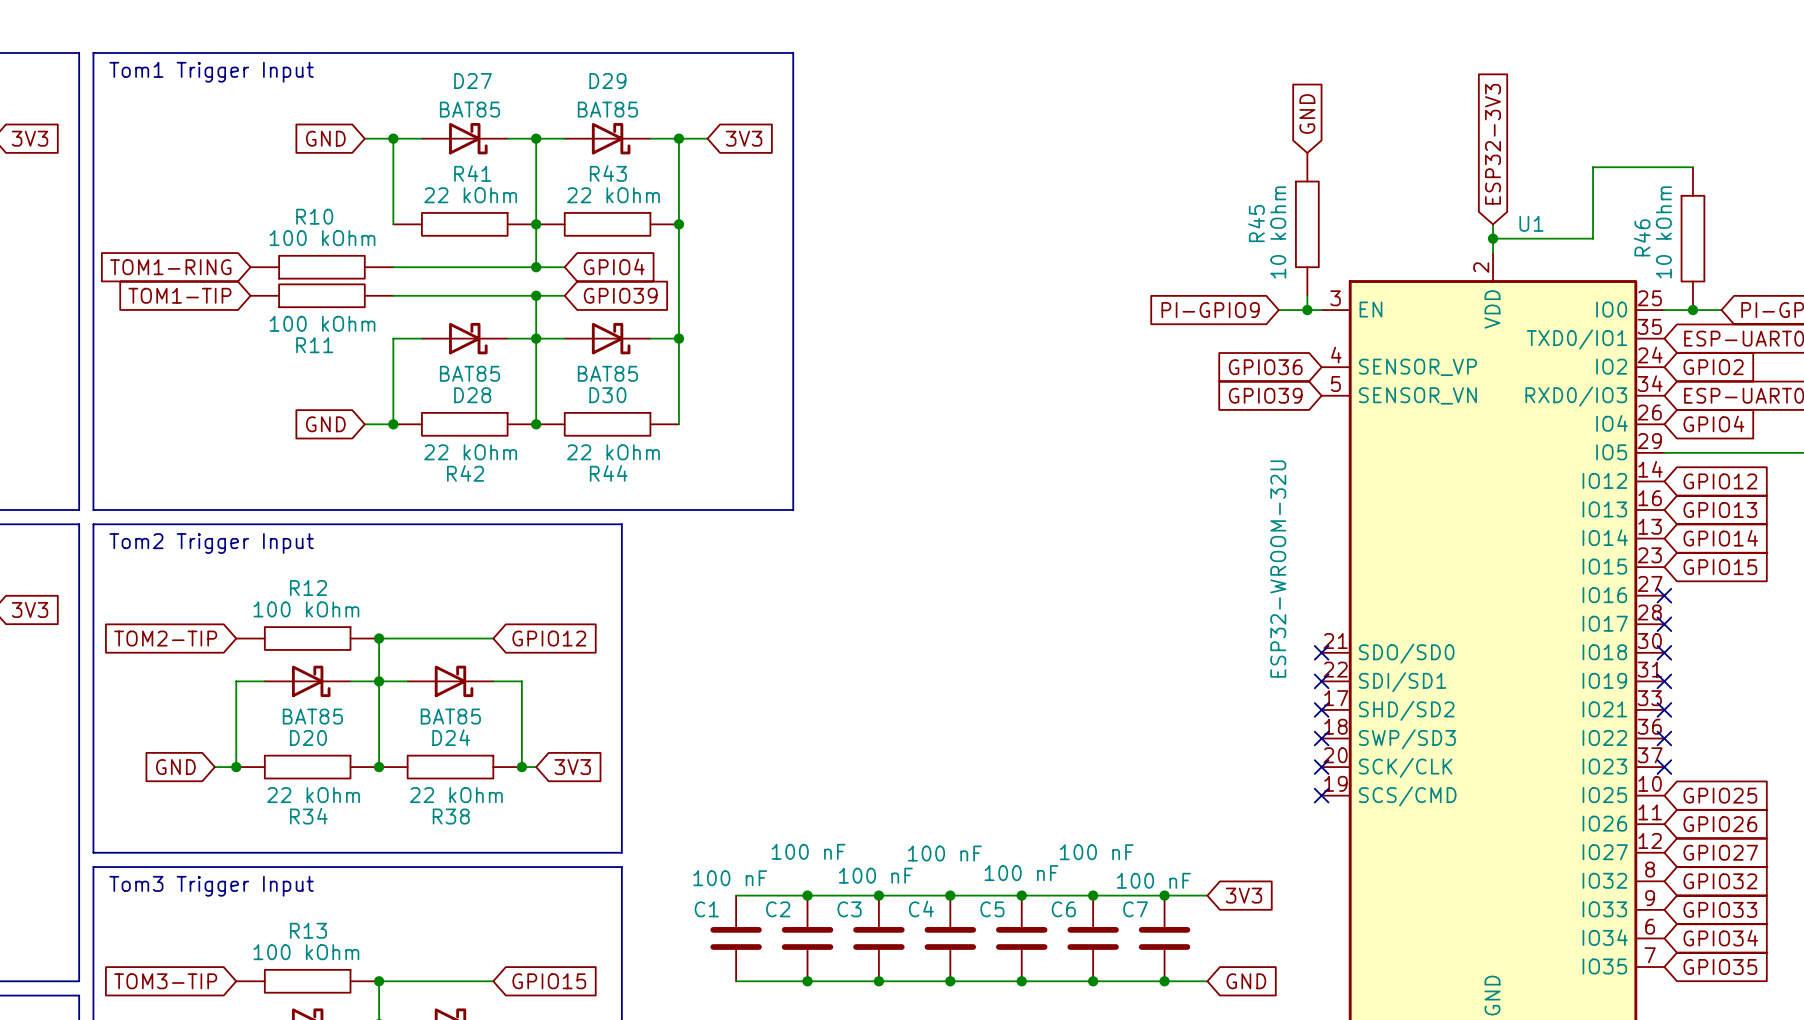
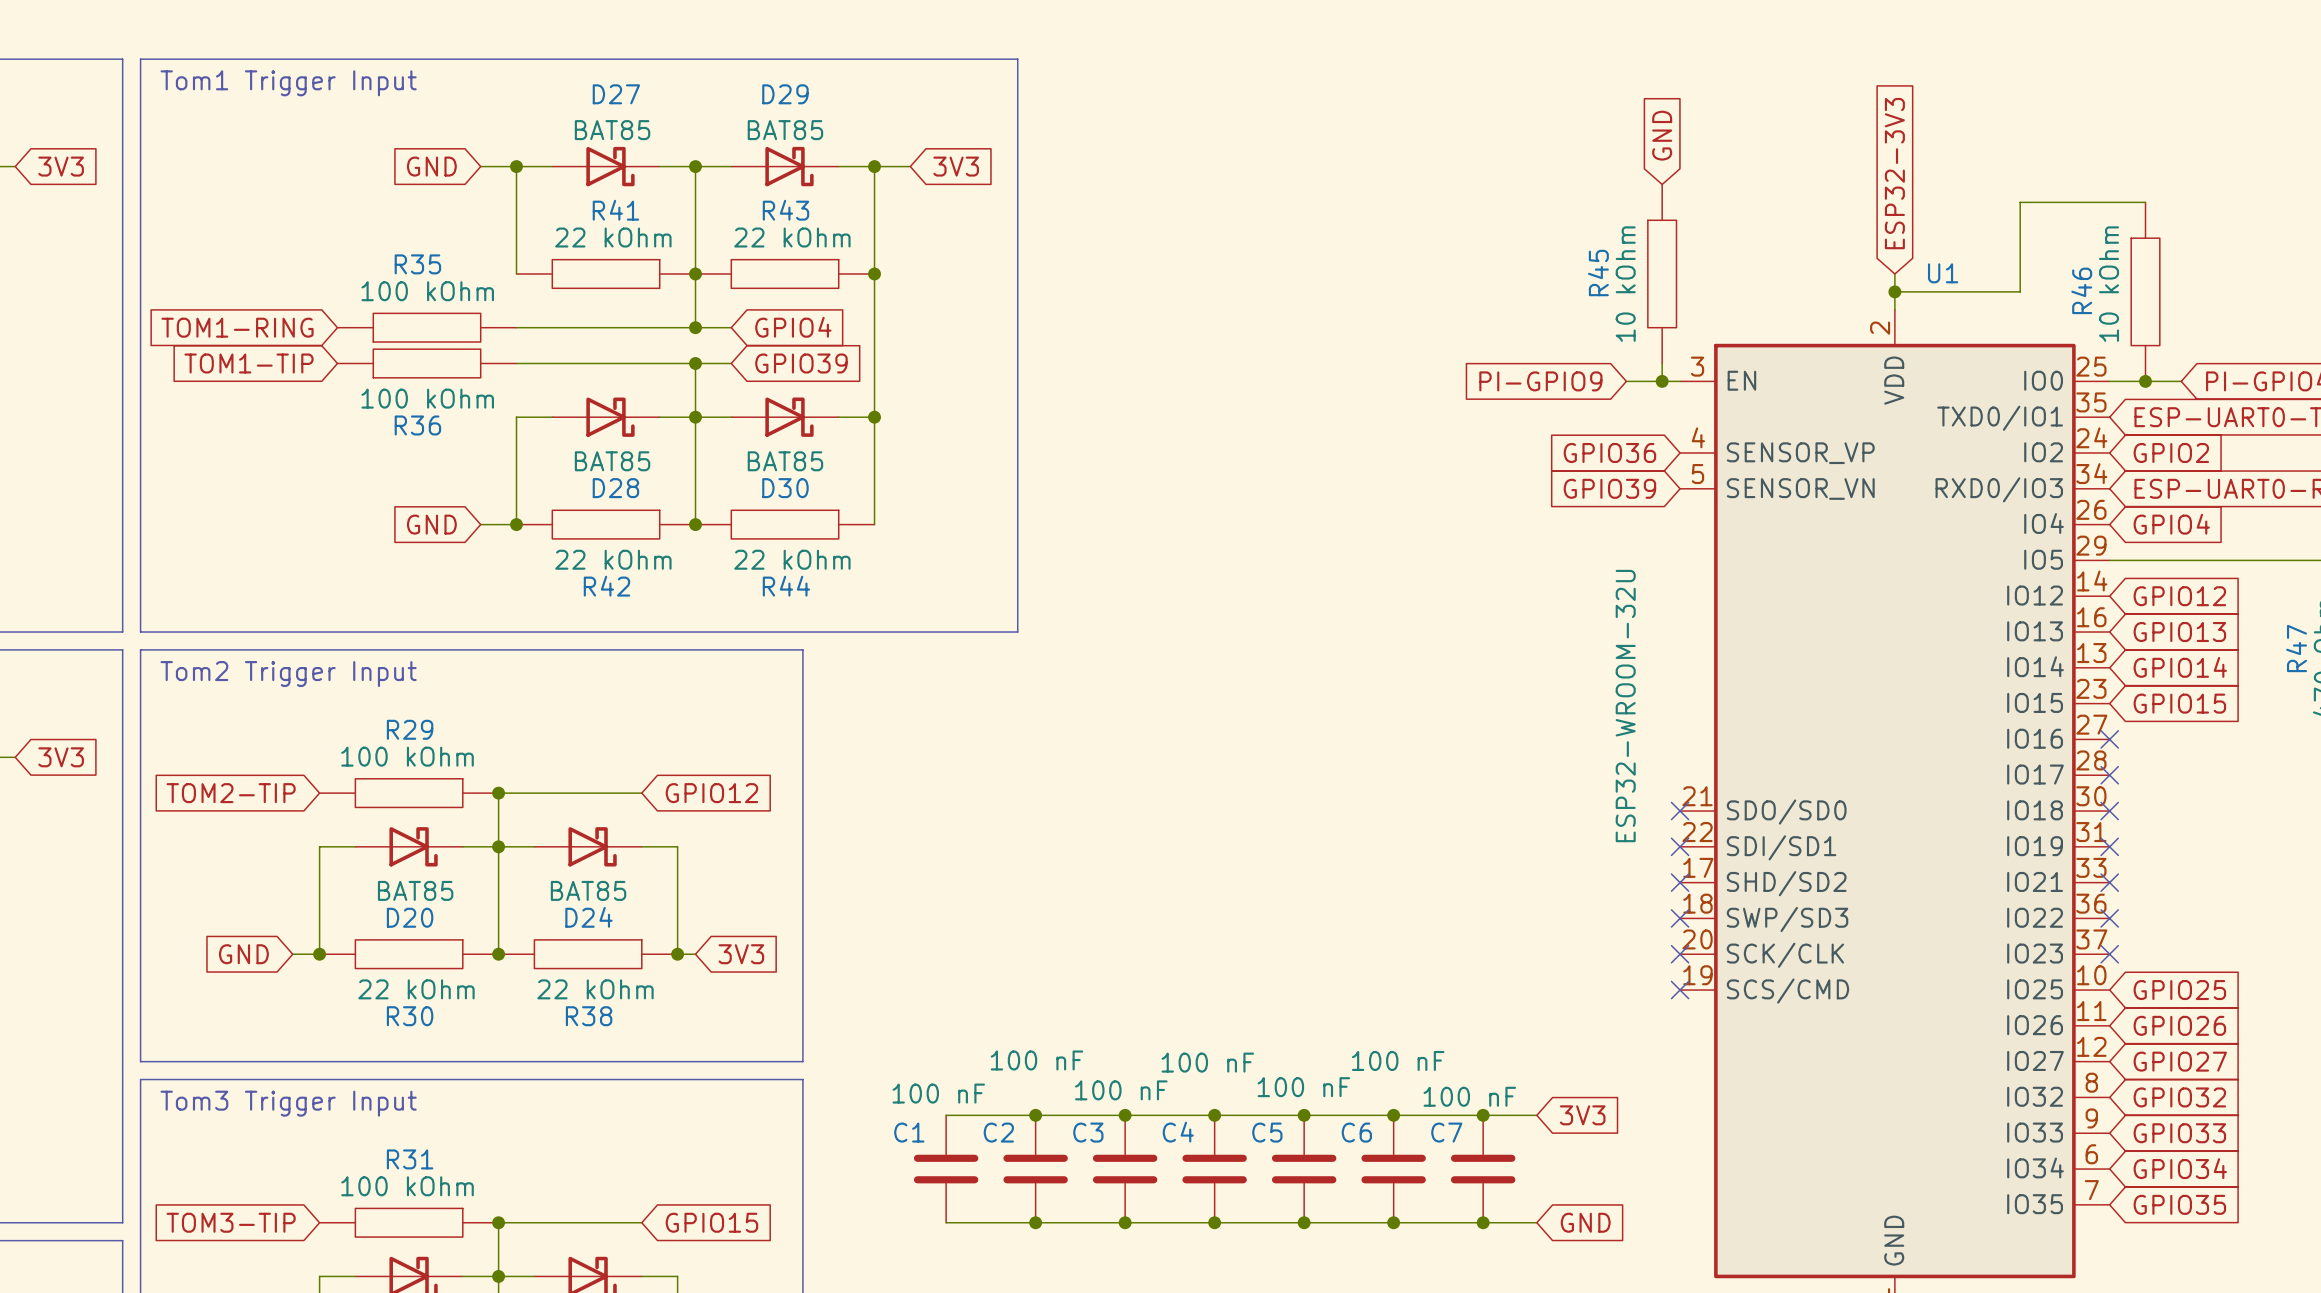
R10 name: R10 (314, 216) -> R35 (417, 264)
R11 name: R11 (314, 345) -> R36 (417, 425)
R12 name: R12 (308, 588) -> R29 (410, 729)
R34 name: R34 (308, 816) -> R30 (410, 1016)
R13 name: R13 (308, 930) -> R31 (410, 1159)

